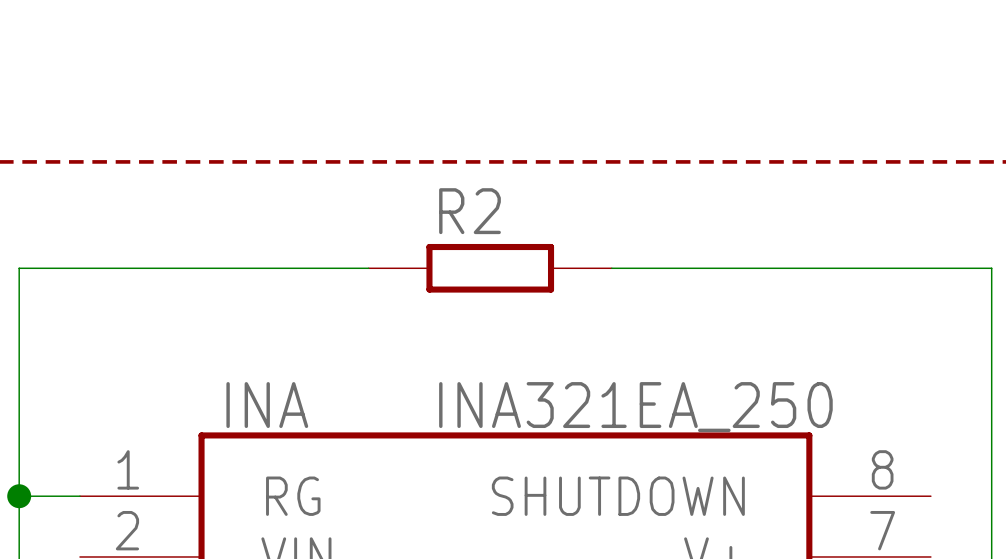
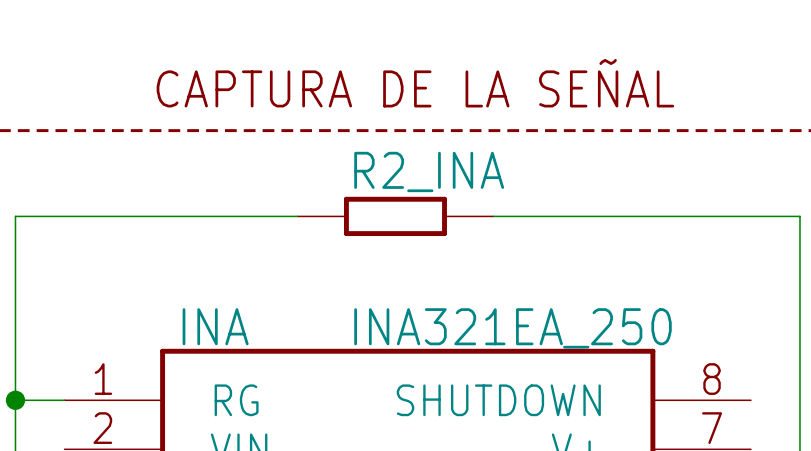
text: none -> CAPTURA DE LA SEÑAL (415, 83)
R2 name: R2 (469, 211) -> R2_INA (429, 171)

